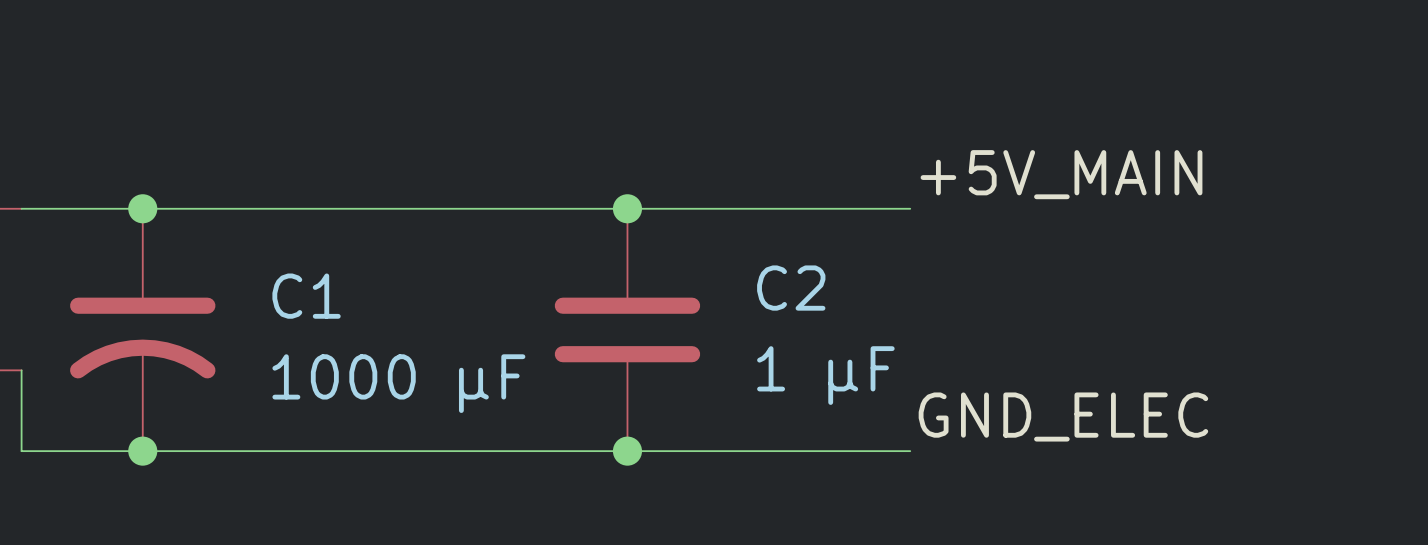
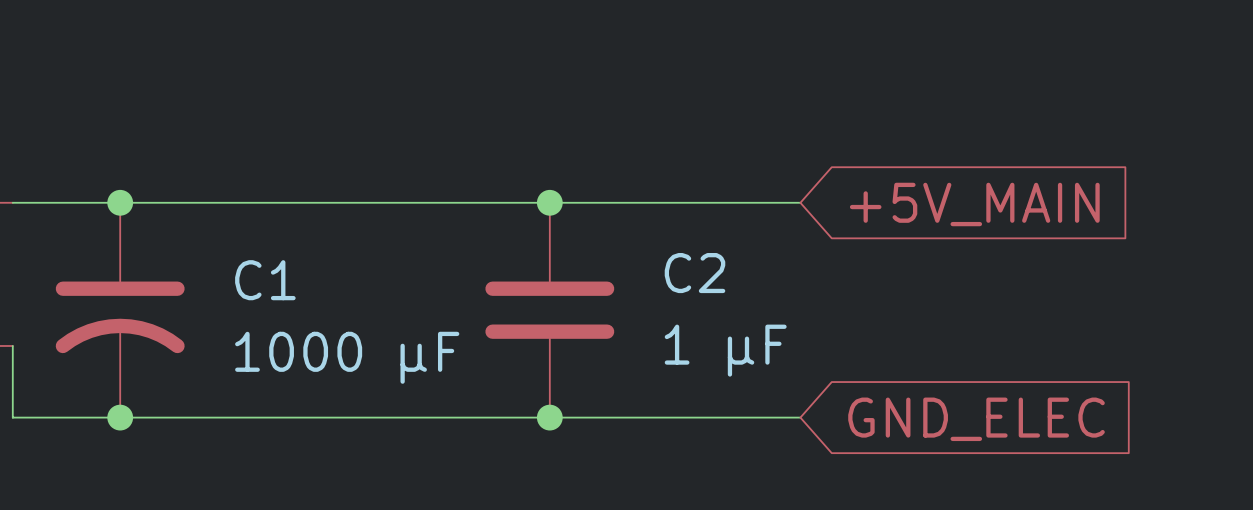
label: +5V_MAIN (1061, 174) -> none
global label: none -> +5V_MAIN (974, 204)
label: GND_ELEC (1063, 417) -> none
global label: none -> GND_ELEC (976, 419)

